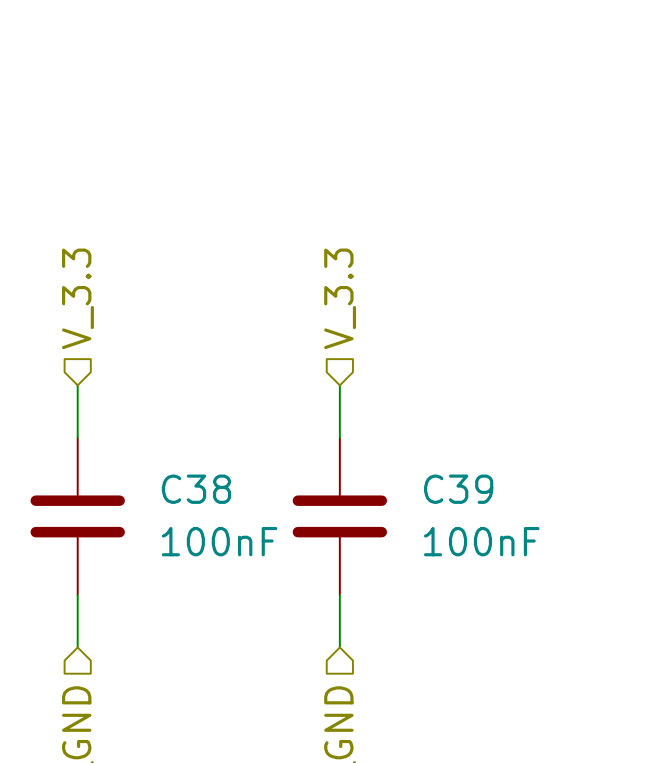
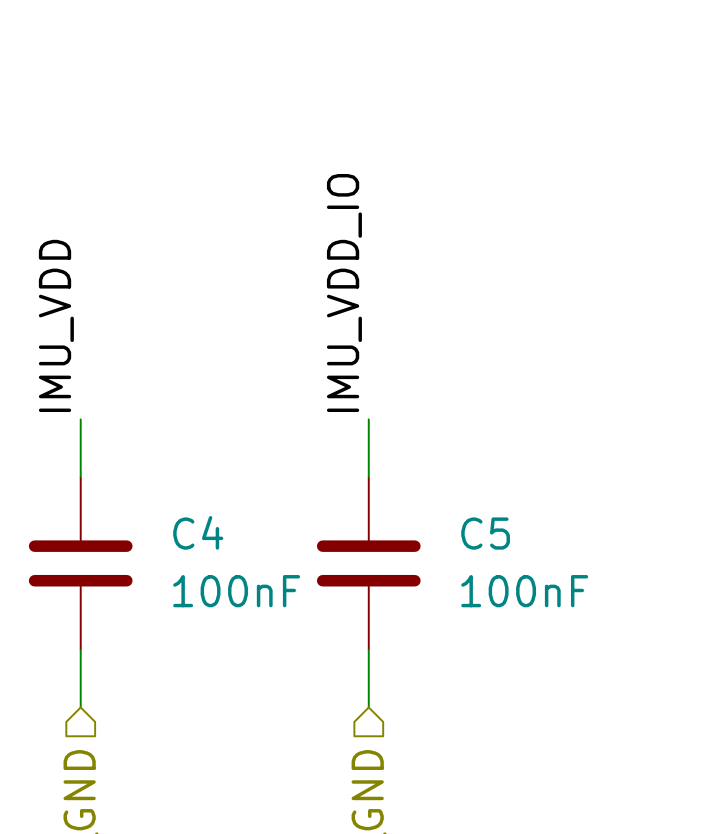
label: none -> IMU_VDD_IO (344, 292)
hierarchical label: V_3.3 (77, 298) -> none
hierarchical label: V_3.3 (340, 298) -> none
label: none -> IMU_VDD (56, 325)
C38 name: C38 (196, 489) -> C4 (198, 532)
C39 name: C39 (458, 489) -> C5 (485, 533)

